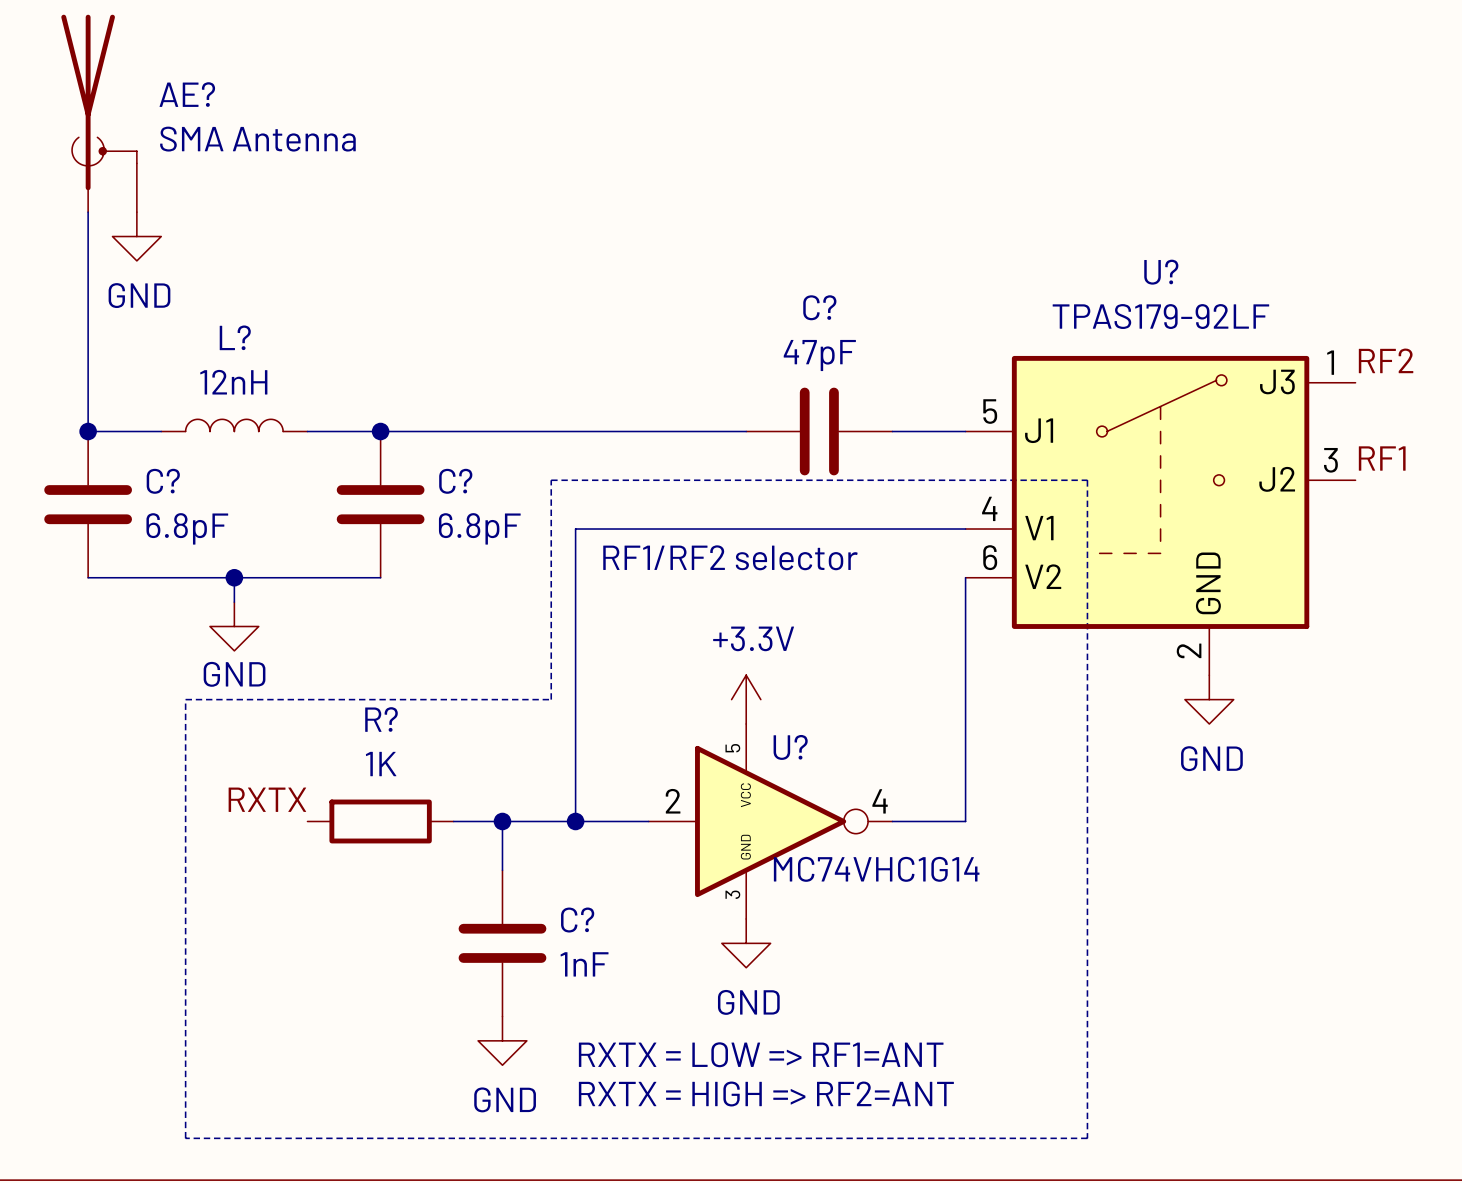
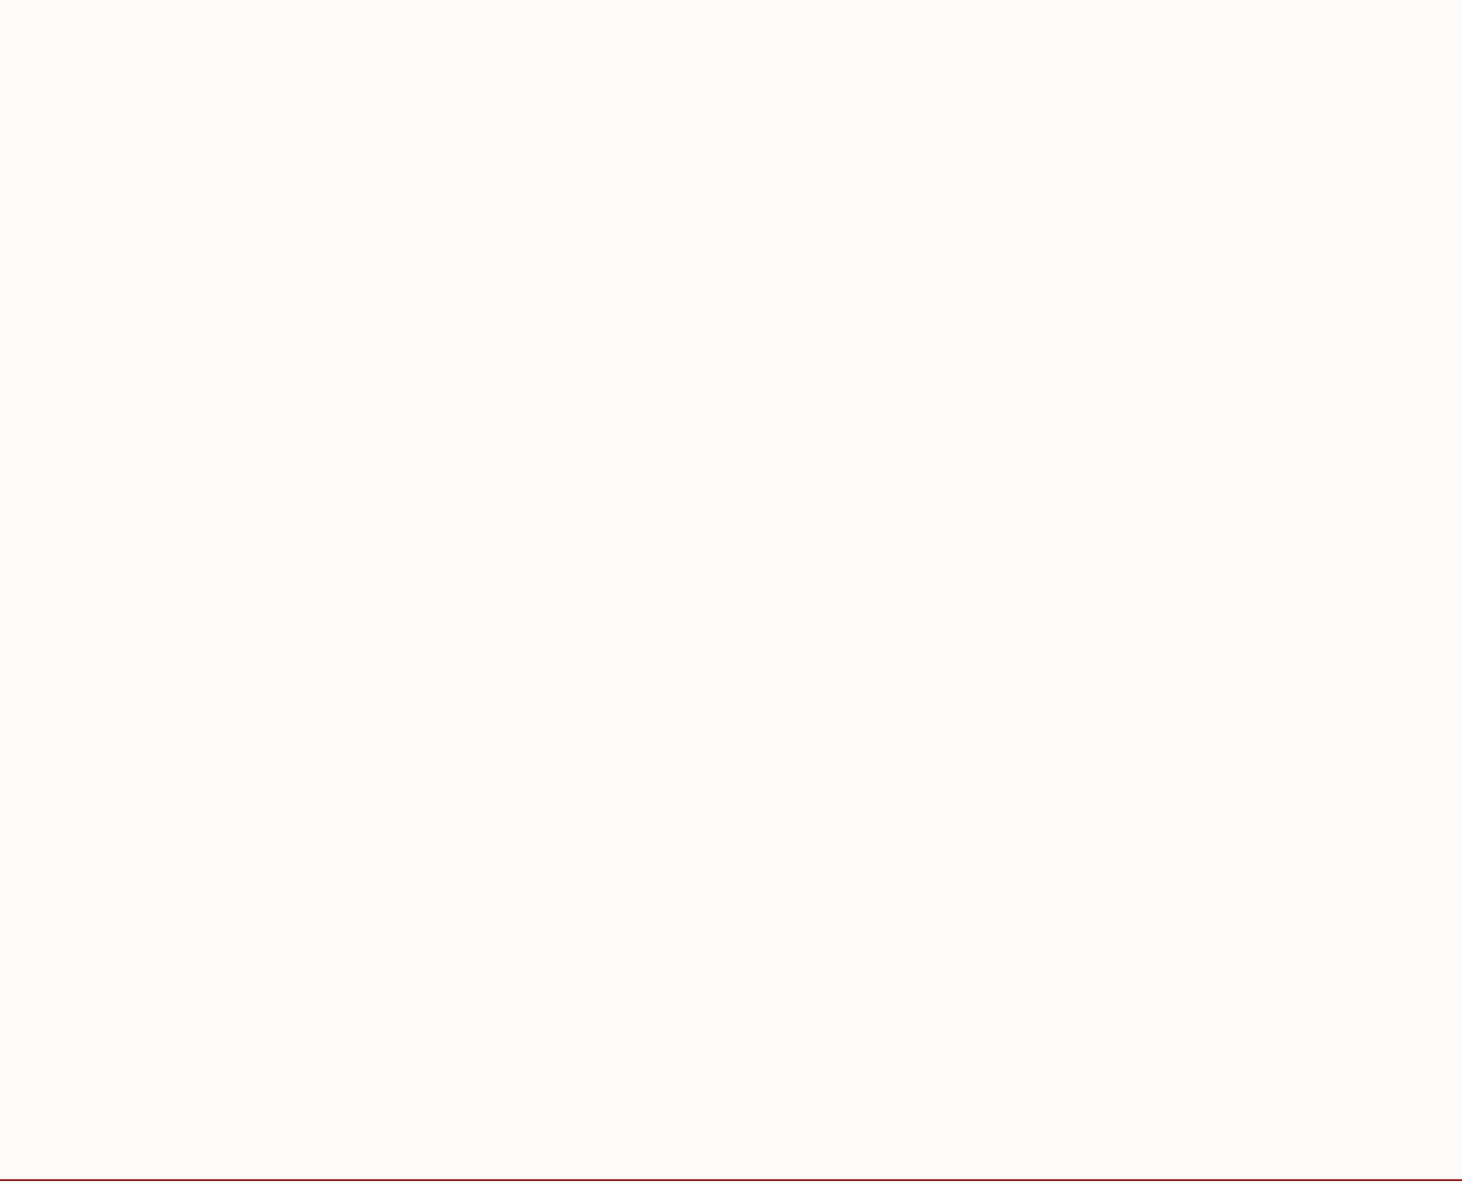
AE?: SMA Antenna (99, 113) -> none
wire: (88, 212) (88, 431) (161, 431) -> none
power symbol: GND (136, 236) -> none
label: RF2 (1386, 360) -> none
L?: 12nH (234, 425) -> none
junction: (88, 431) -> none
wire: (307, 431) (746, 431) -> none
junction: (380, 431) -> none
C?: 47pF (819, 431) -> none
wire: (892, 431) (965, 431) -> none
label: RF1 (1382, 458) -> none
line: (551, 480) (551, 699) (185, 699) (185, 1138) (1087, 1138) (1087, 480) (551, 480) -> none
C?: 6.8pF (88, 504) -> none
C?: 6.8pF (380, 504) -> none
U?: TPAS179-92LF (1160, 515) -> none
wire: (965, 529) (575, 529) (575, 821) -> none
text: RF1/RF2 selector (730, 557) -> none
wire: (88, 577) (380, 577) -> none
wire: (234, 577) (234, 602) -> none
junction: (234, 577) -> none
wire: (965, 577) (965, 821) (892, 821) -> none
power symbol: GND (234, 626) -> none
power symbol: +3.3V (746, 699) -> none
power symbol: GND (1209, 699) -> none
label: RXTX (267, 799) -> none
R?: 1K (380, 821) -> none
wire: (453, 821) (648, 821) -> none
wire: (502, 821) (502, 870) -> none
junction: (502, 821) -> none
junction: (575, 821) -> none
U?: MC74VHC1G14 (770, 821) -> none
C?: 1nF (502, 943) -> none
power symbol: GND (746, 943) -> none
power symbol: GND (502, 1040) -> none
text: RXTX = LOW => RF1=ANT (761, 1054) -> none
text: RXTX = HIGH => RF2=ANT (766, 1094) -> none

